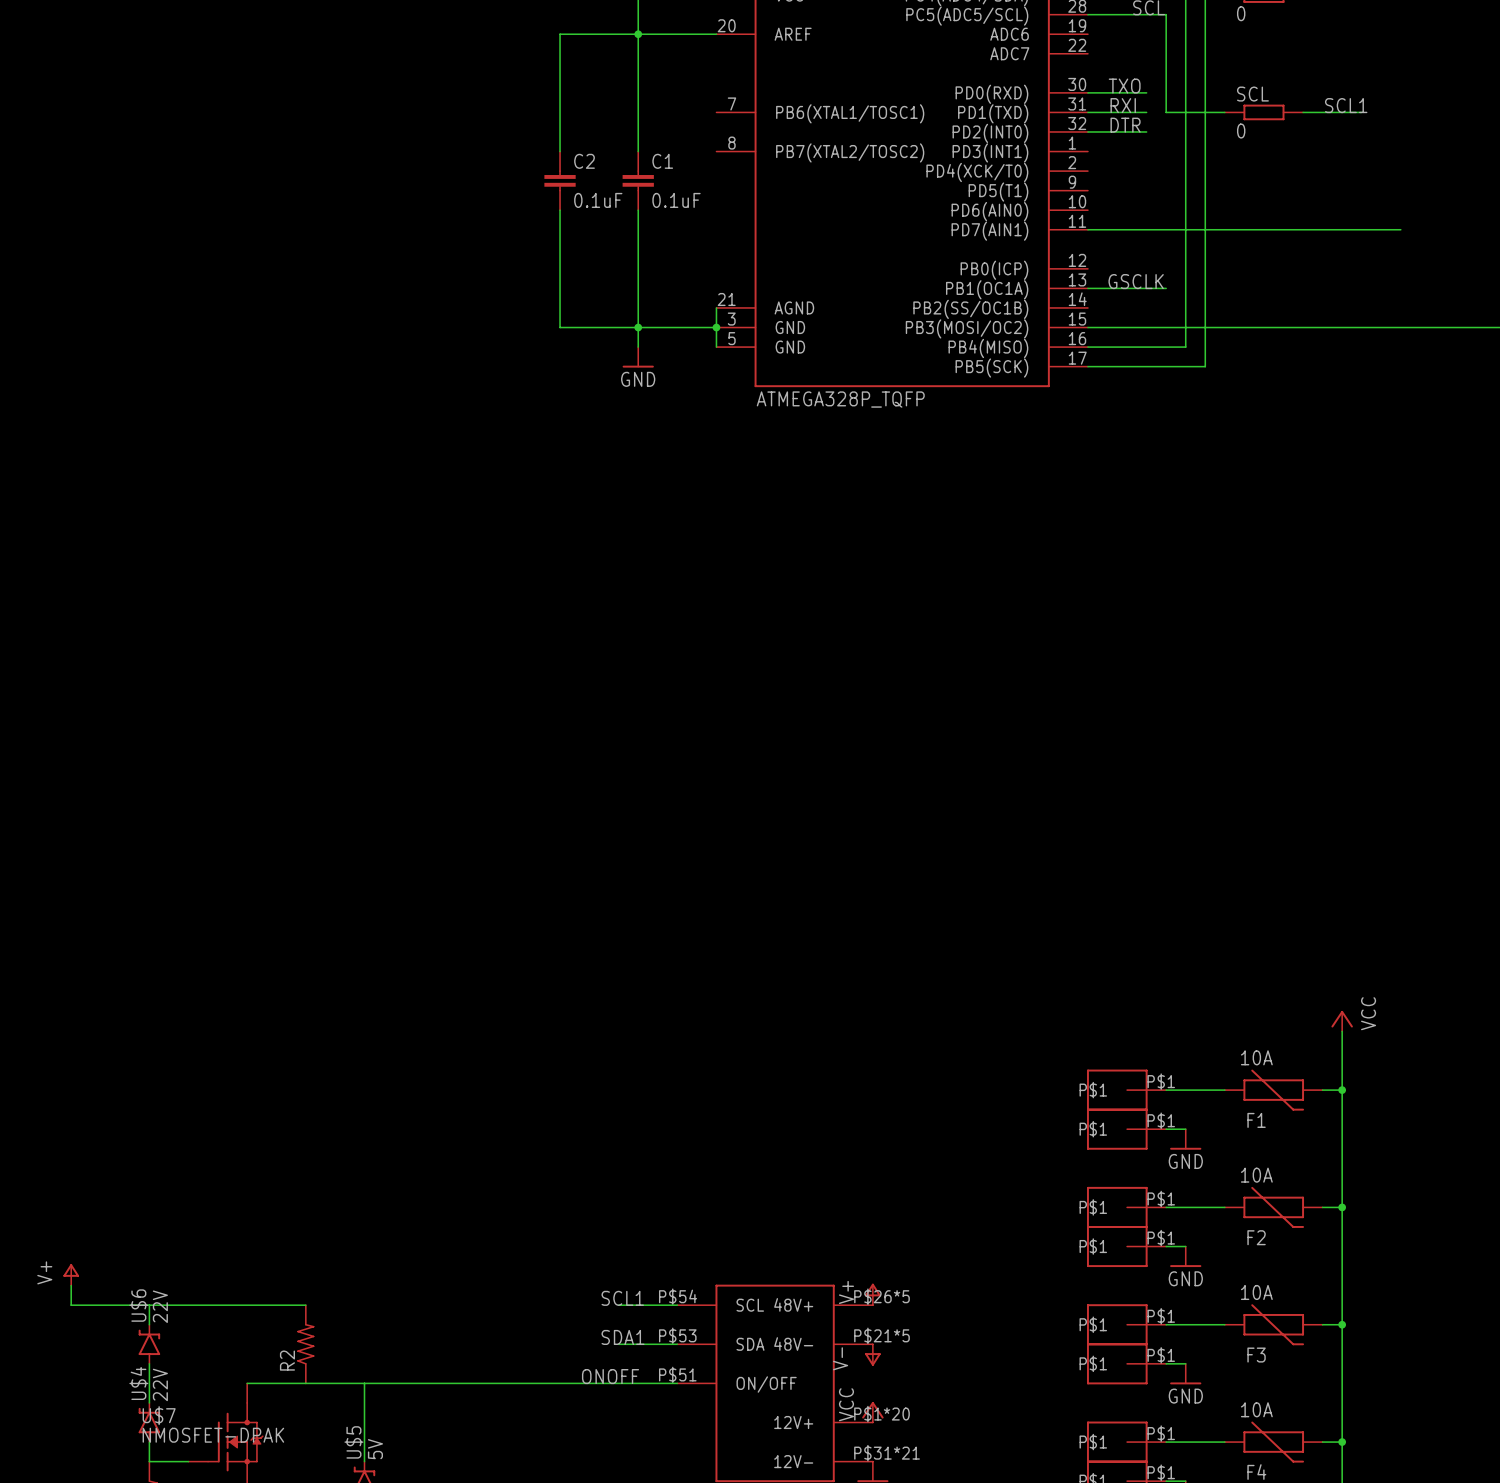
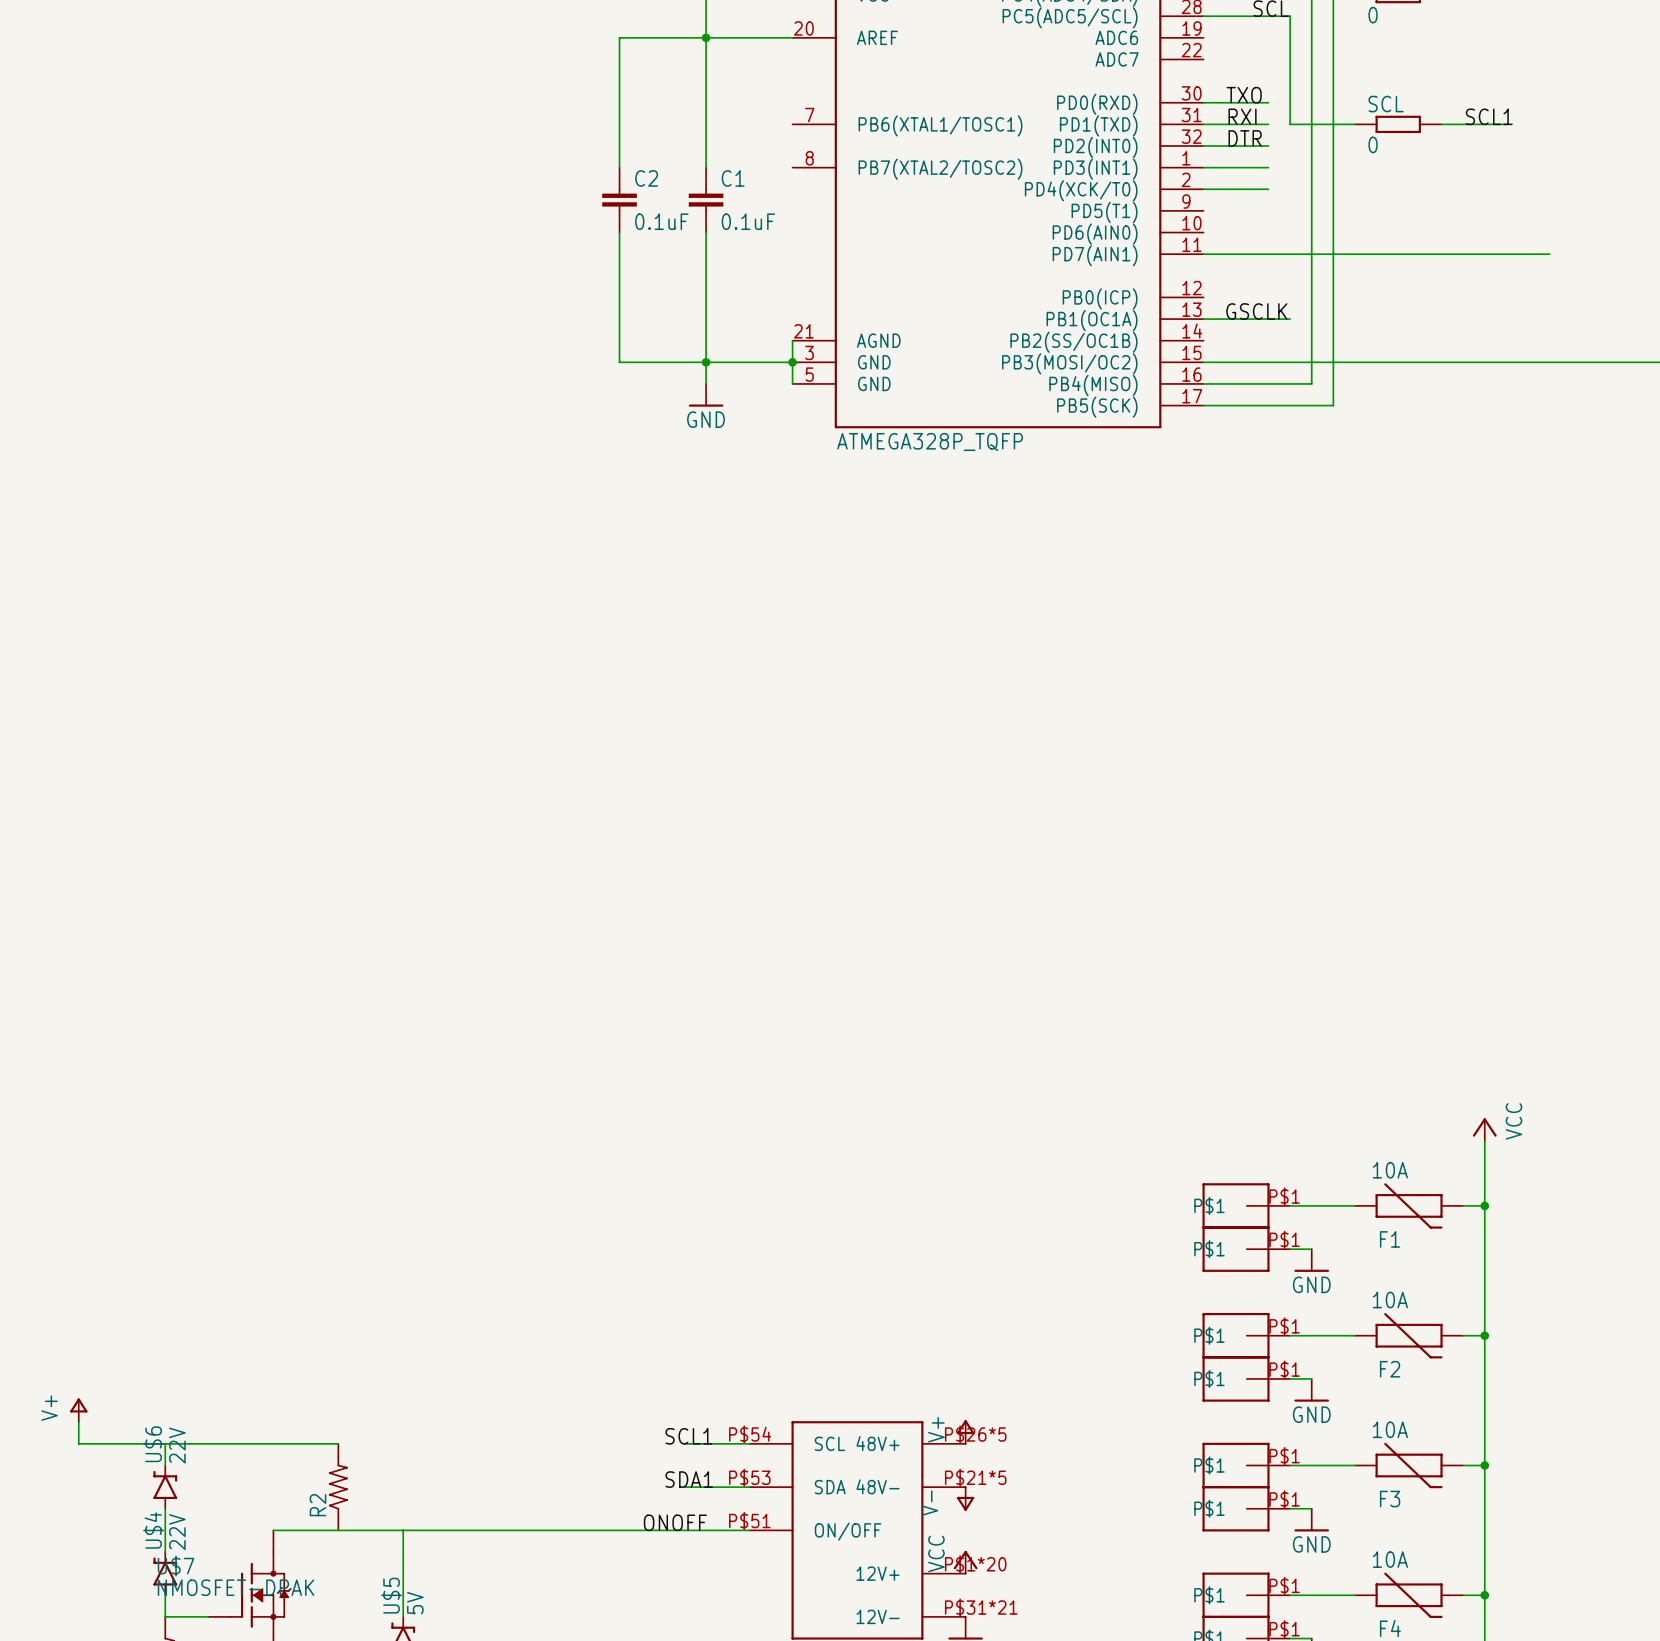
wire: none -> (1203, 167) (1268, 167)
wire: none -> (1203, 189) (1268, 189)

